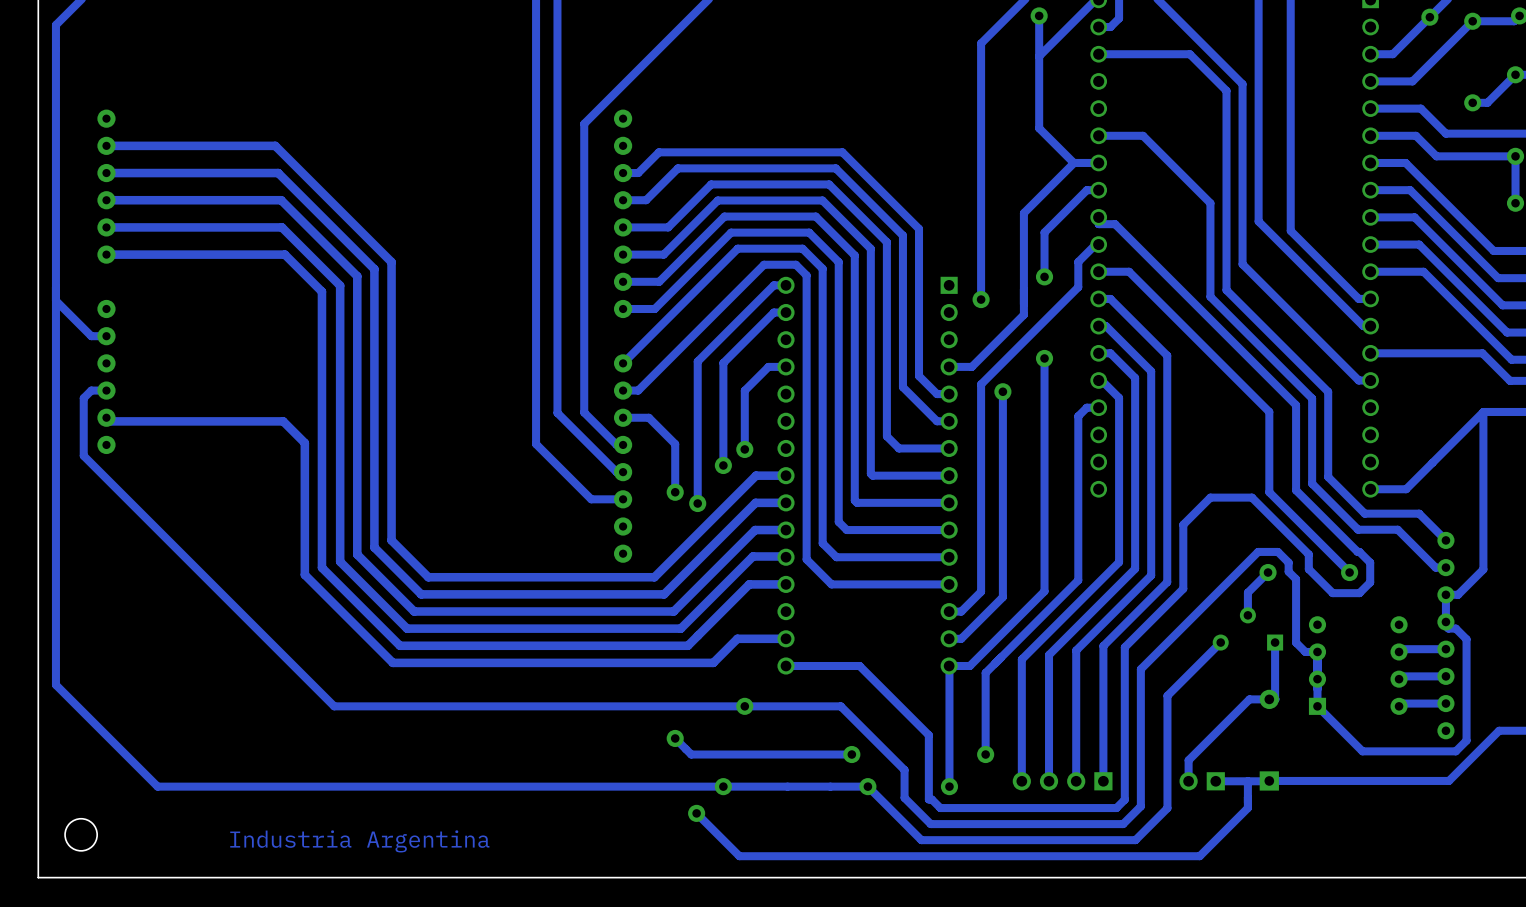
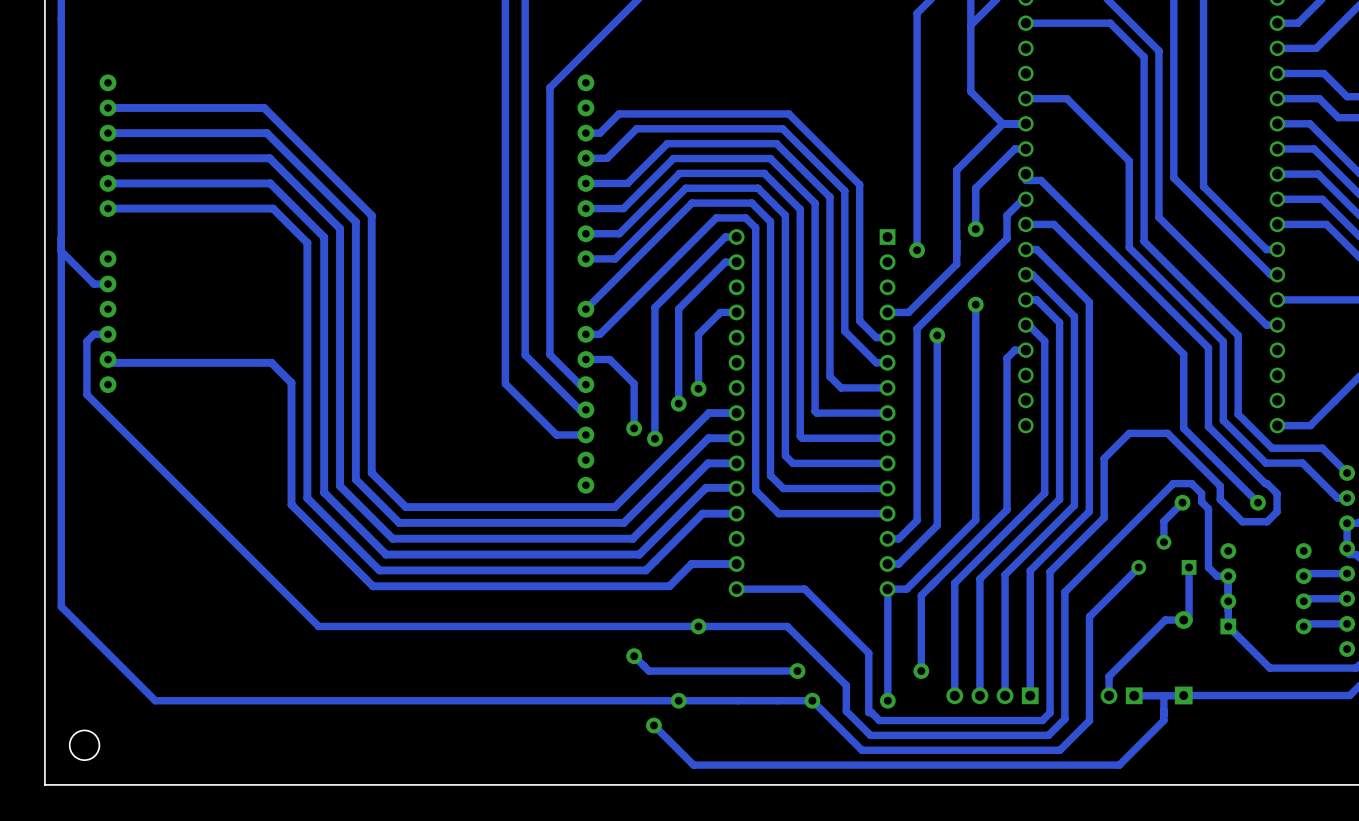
text: Industria Argentina (359, 841) -> none

